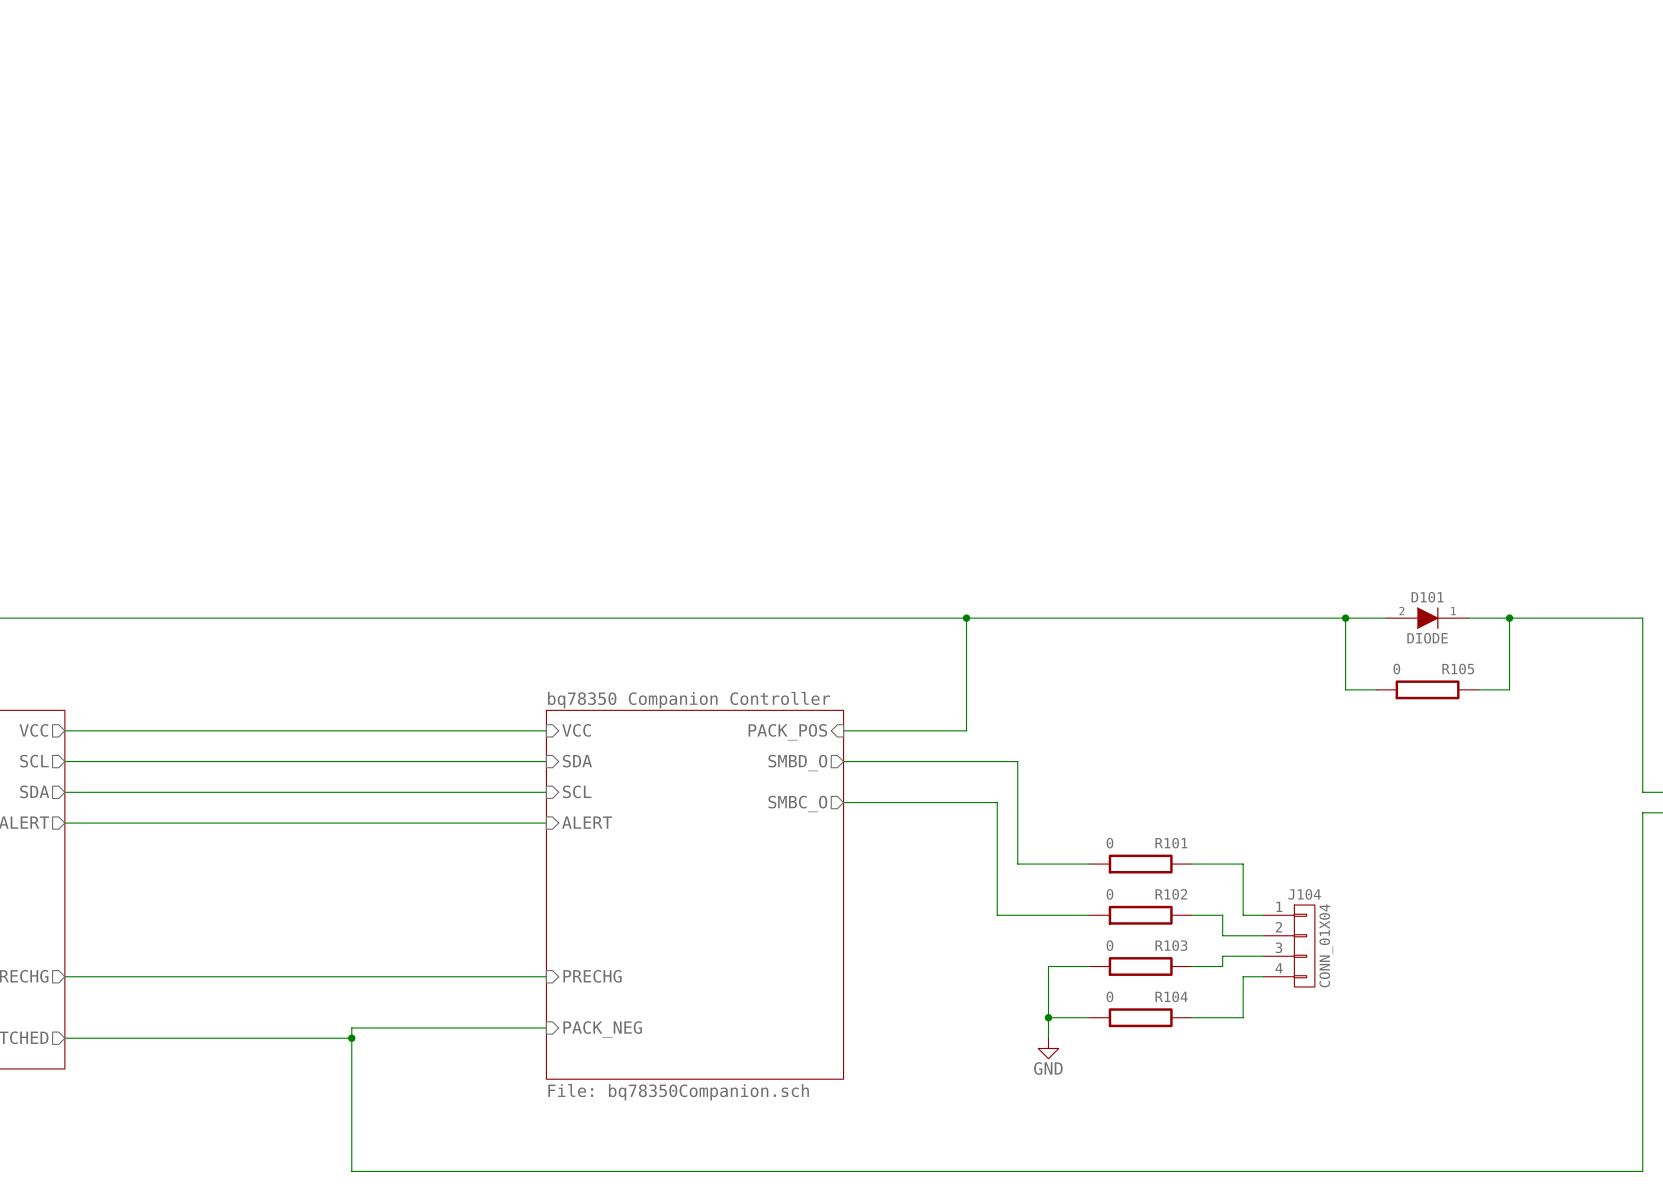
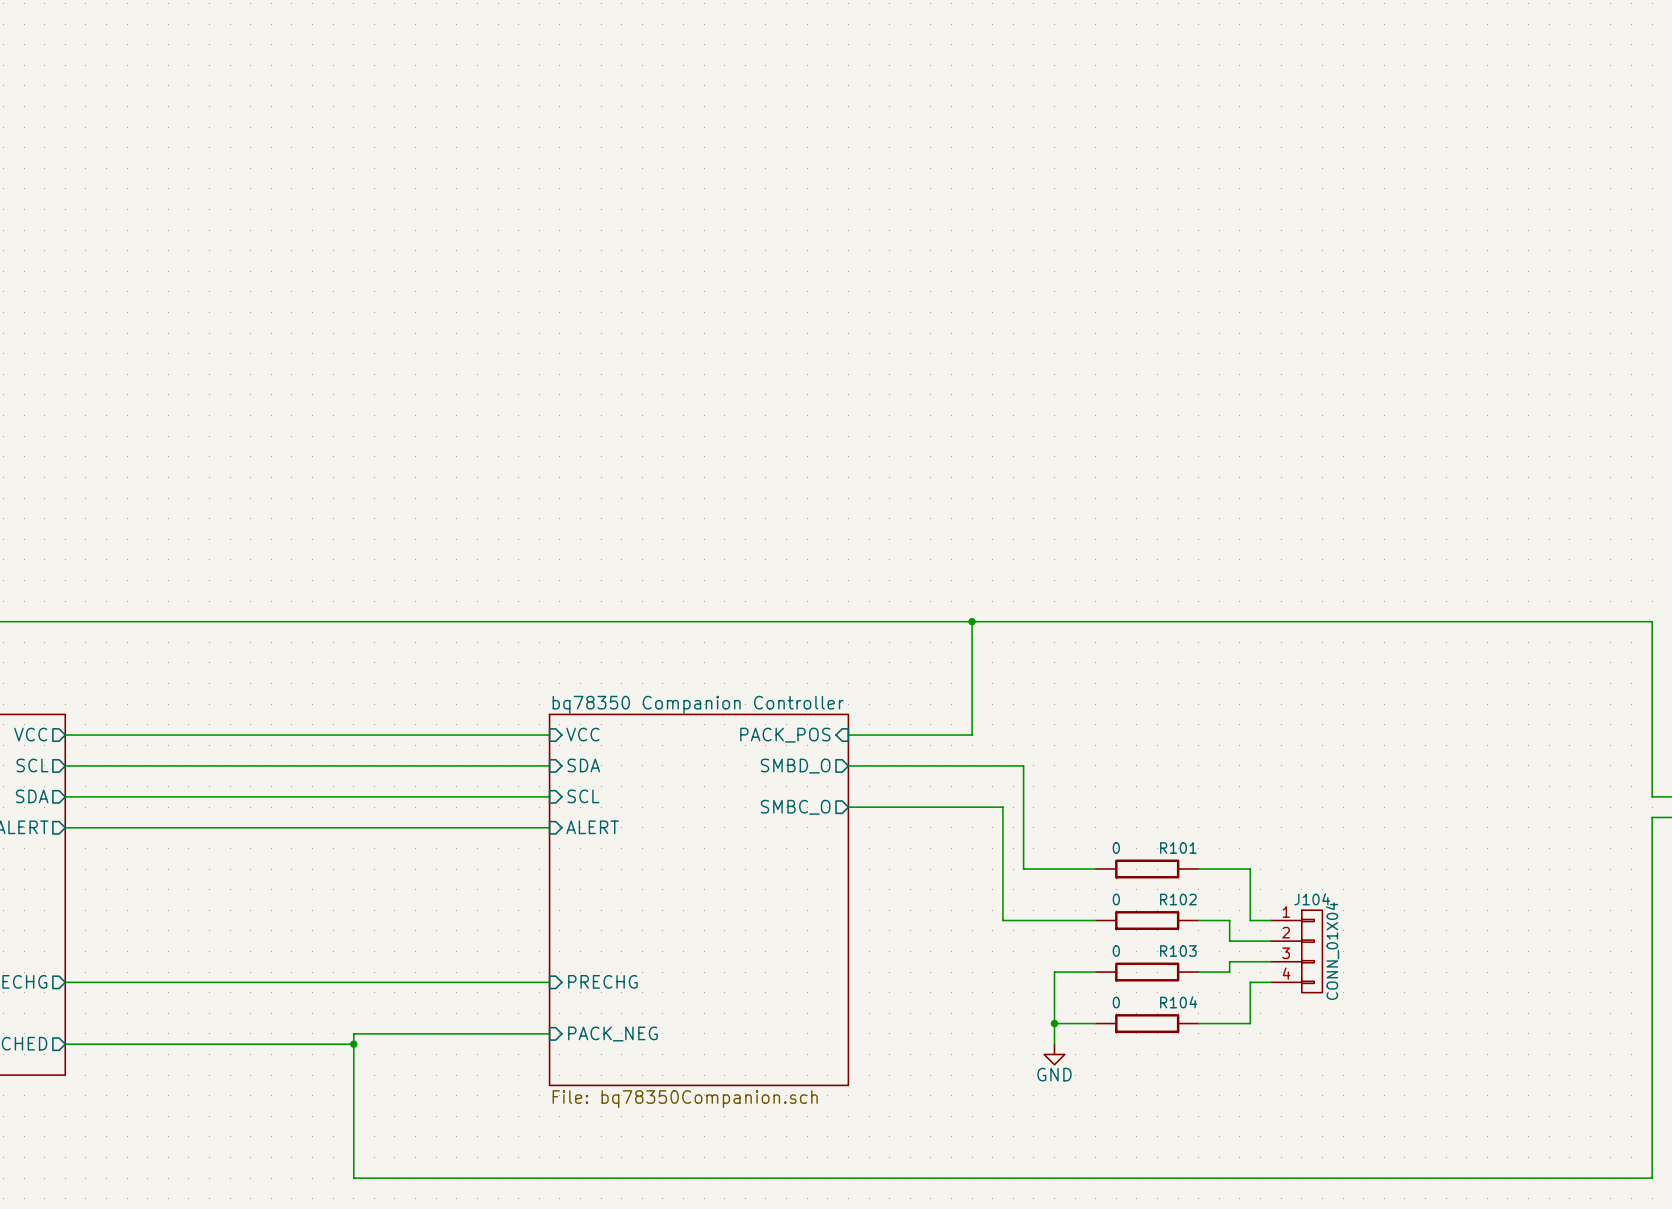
wire: (1345, 618) (1345, 689) (1376, 689) -> none
junction: (1345, 618) -> none
D101: DIODE (1427, 618) -> none
wire: (1509, 618) (1509, 689) (1478, 689) -> none
junction: (1509, 618) -> none
R105: 0 (1427, 689) -> none

